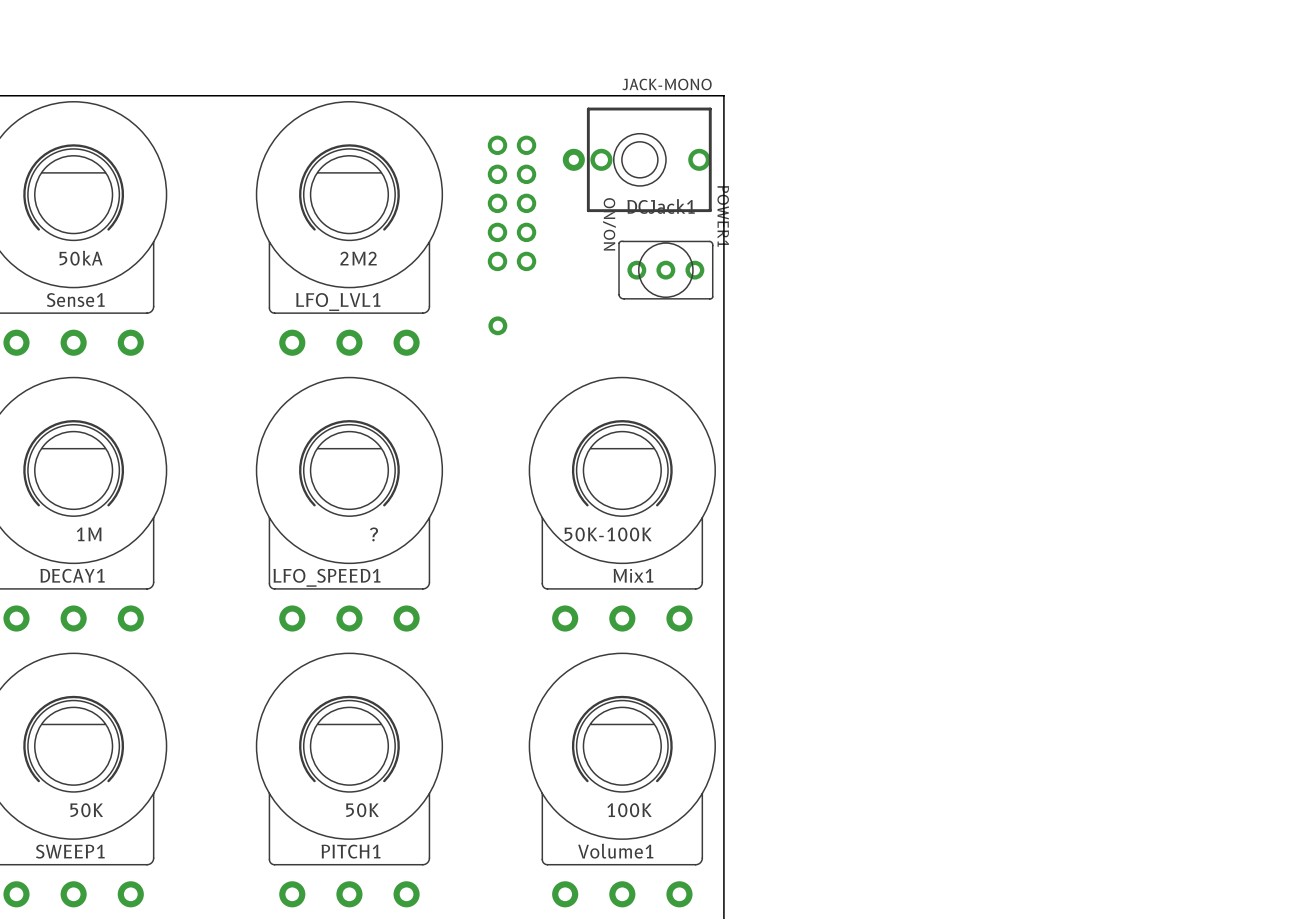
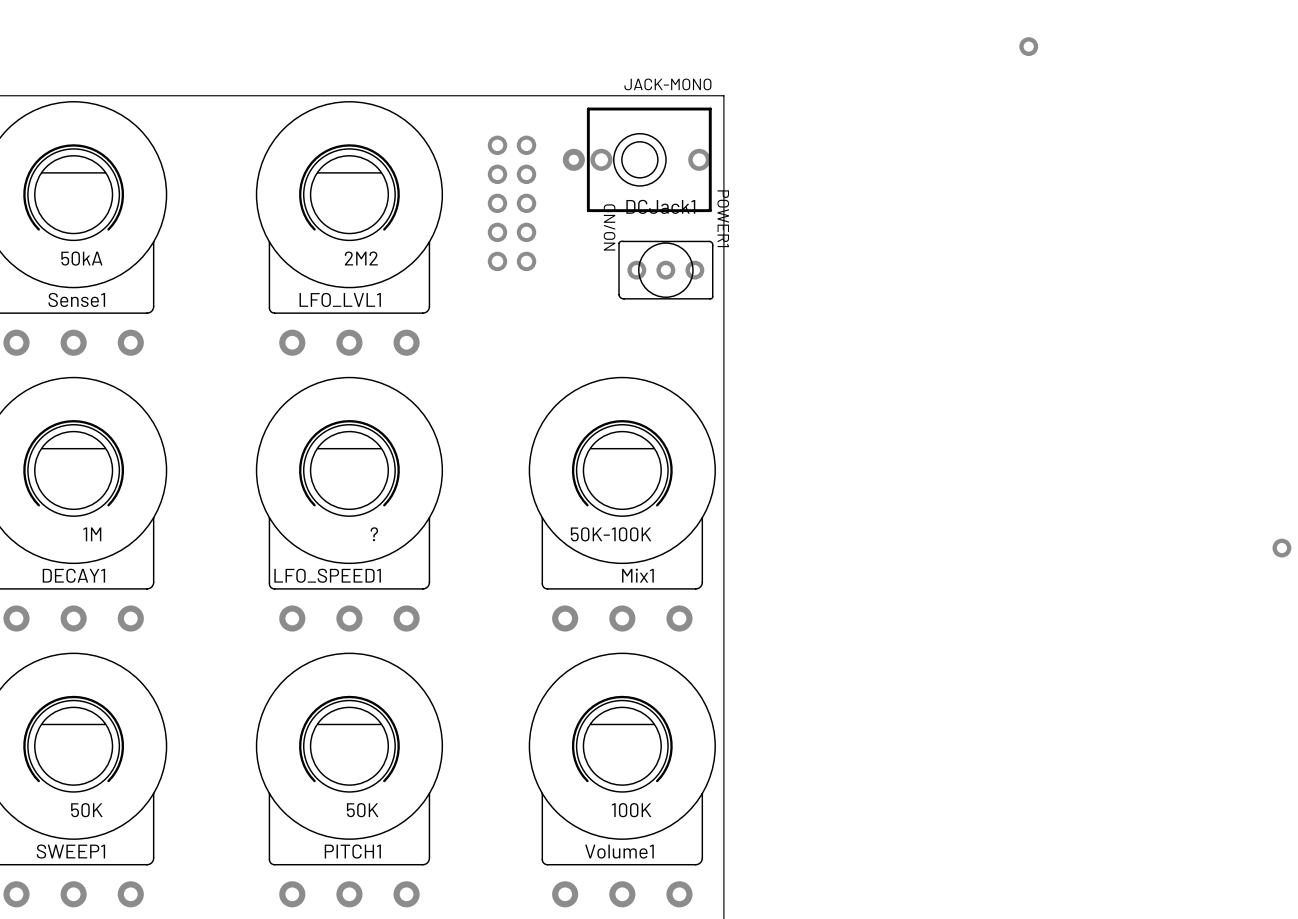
part: none -> (1028, 46)
part: (497, 325) -> none
part: none -> (1281, 548)

